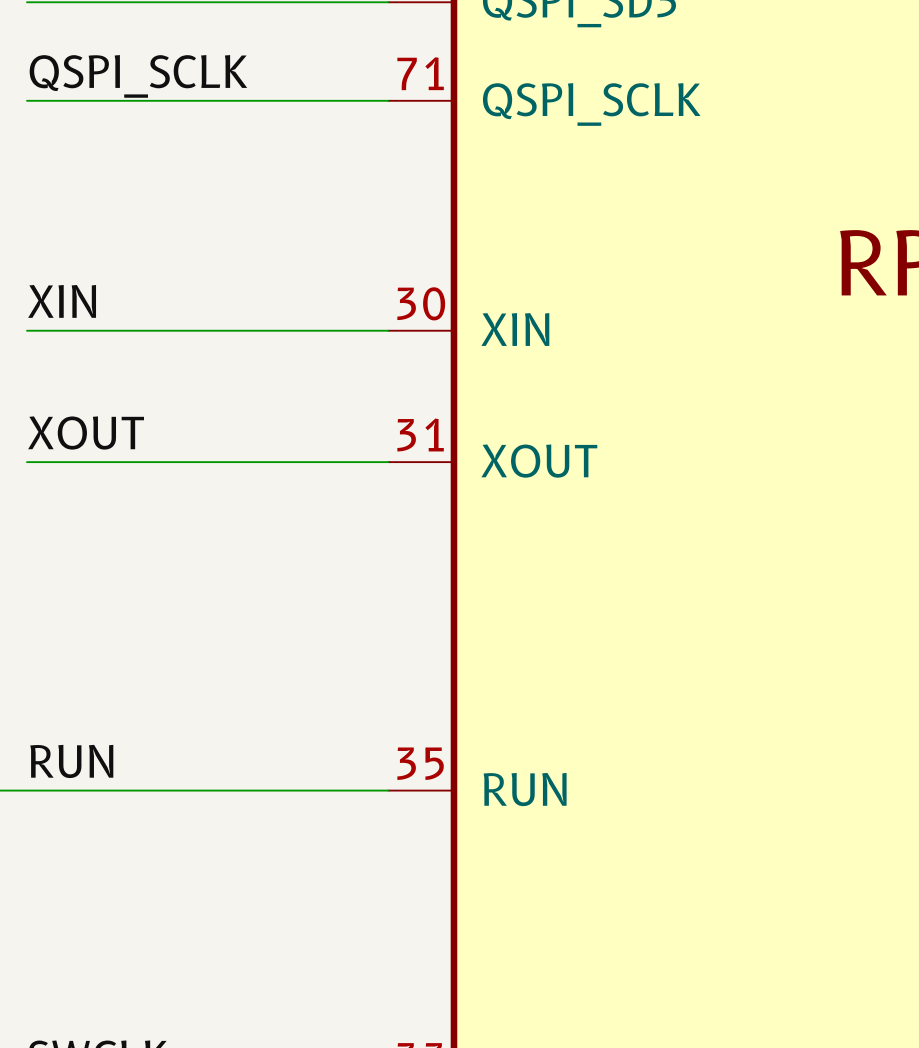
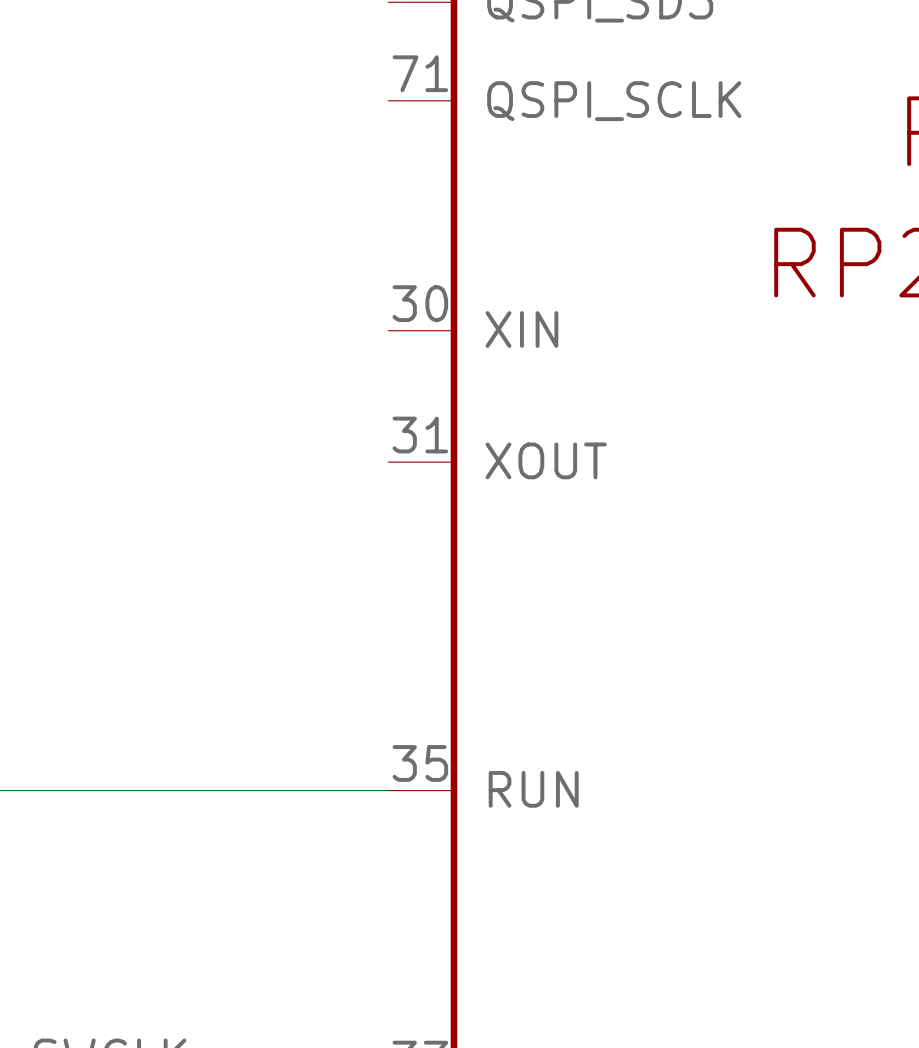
wire: (26, 2) (388, 2) -> none
label: QSPI_SCLK (138, 76) -> none
wire: (26, 100) (388, 100) -> none
label: XIN (62, 301) -> none
wire: (26, 330) (388, 330) -> none
label: XOUT (86, 432) -> none
wire: (26, 462) (388, 462) -> none
label: RUN (71, 761) -> none

